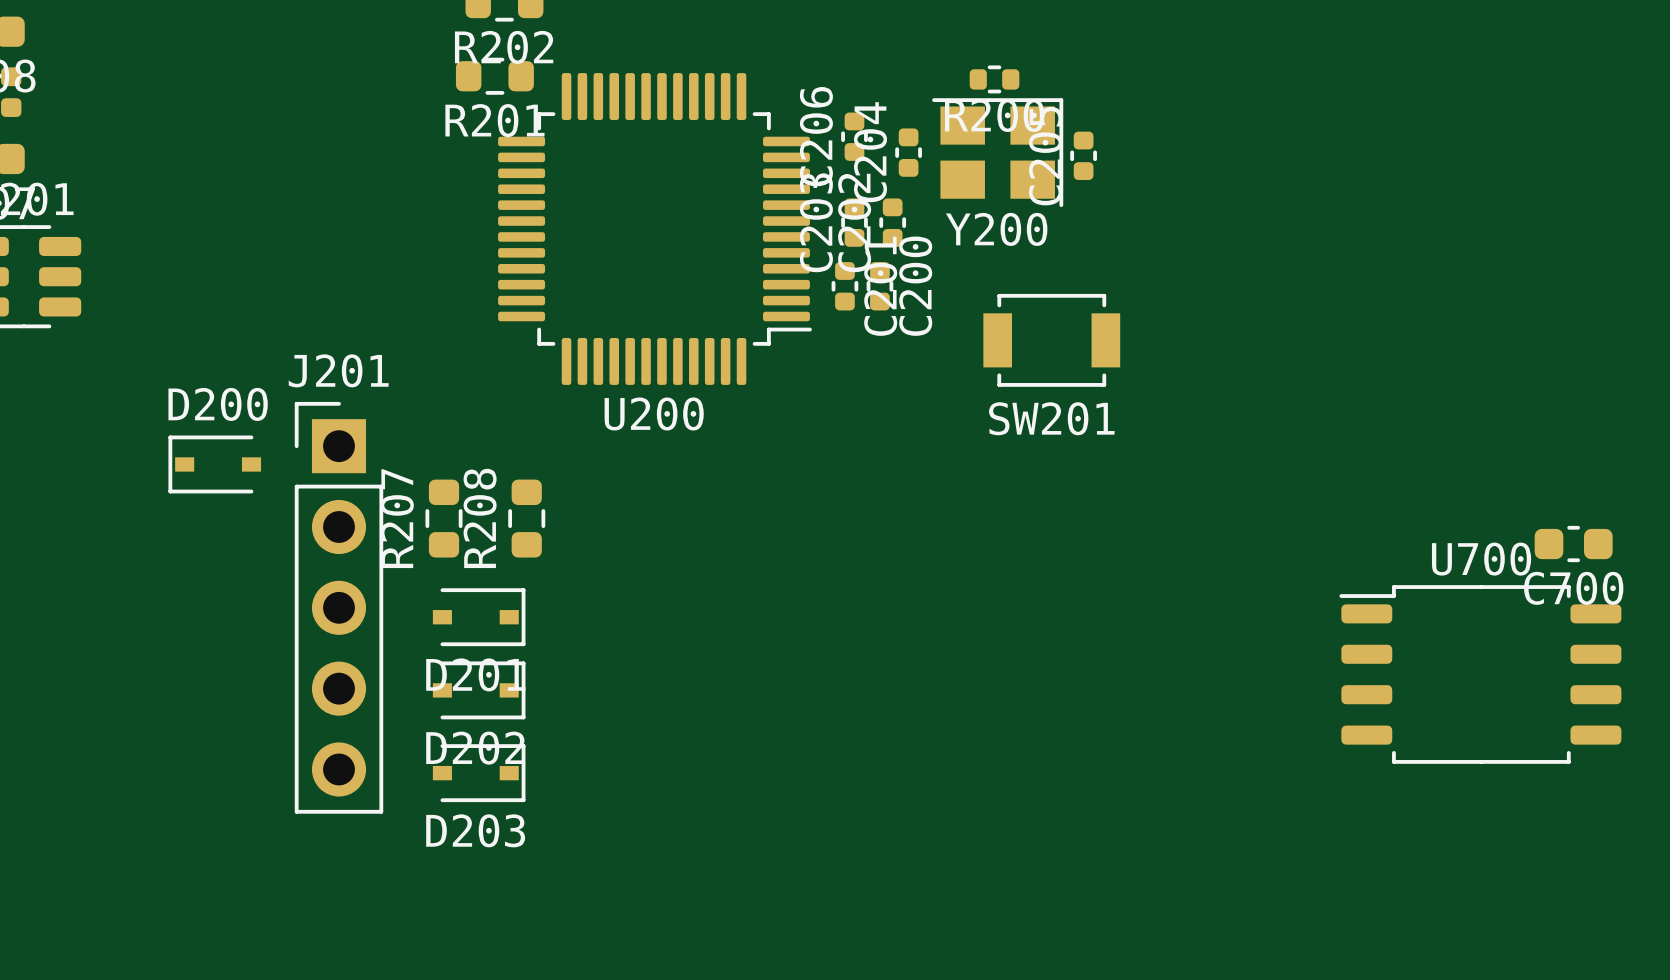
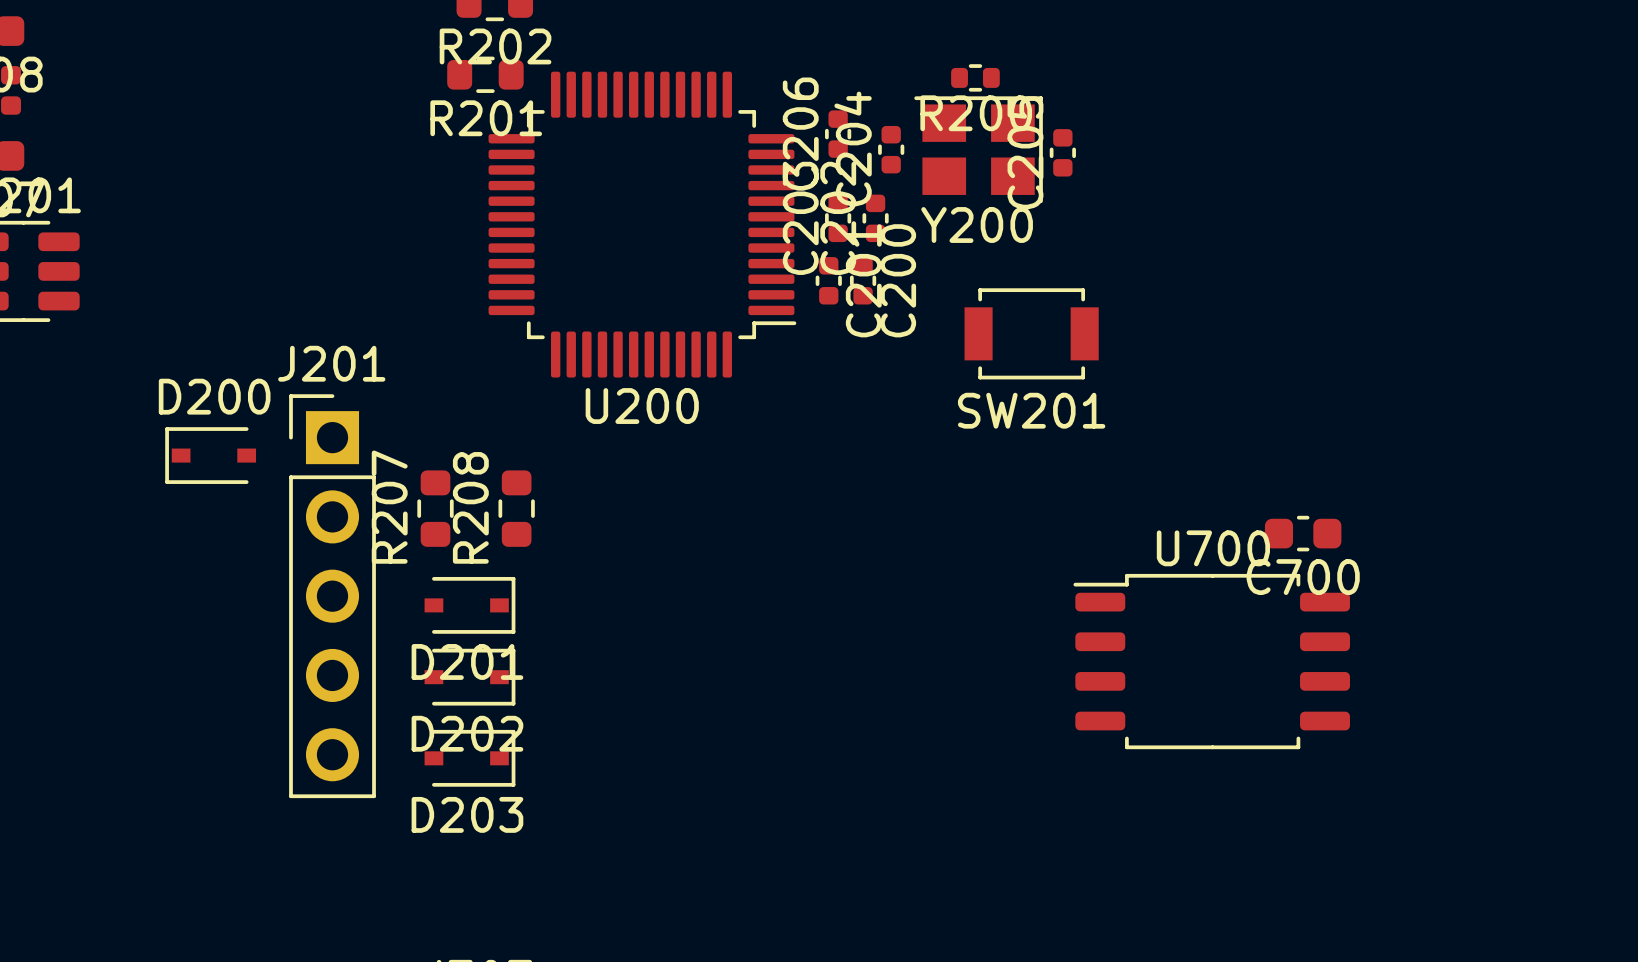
C700 position: (1573, 544) -> (1303, 533)
U700 position: (1480, 674) -> (1211, 661)

